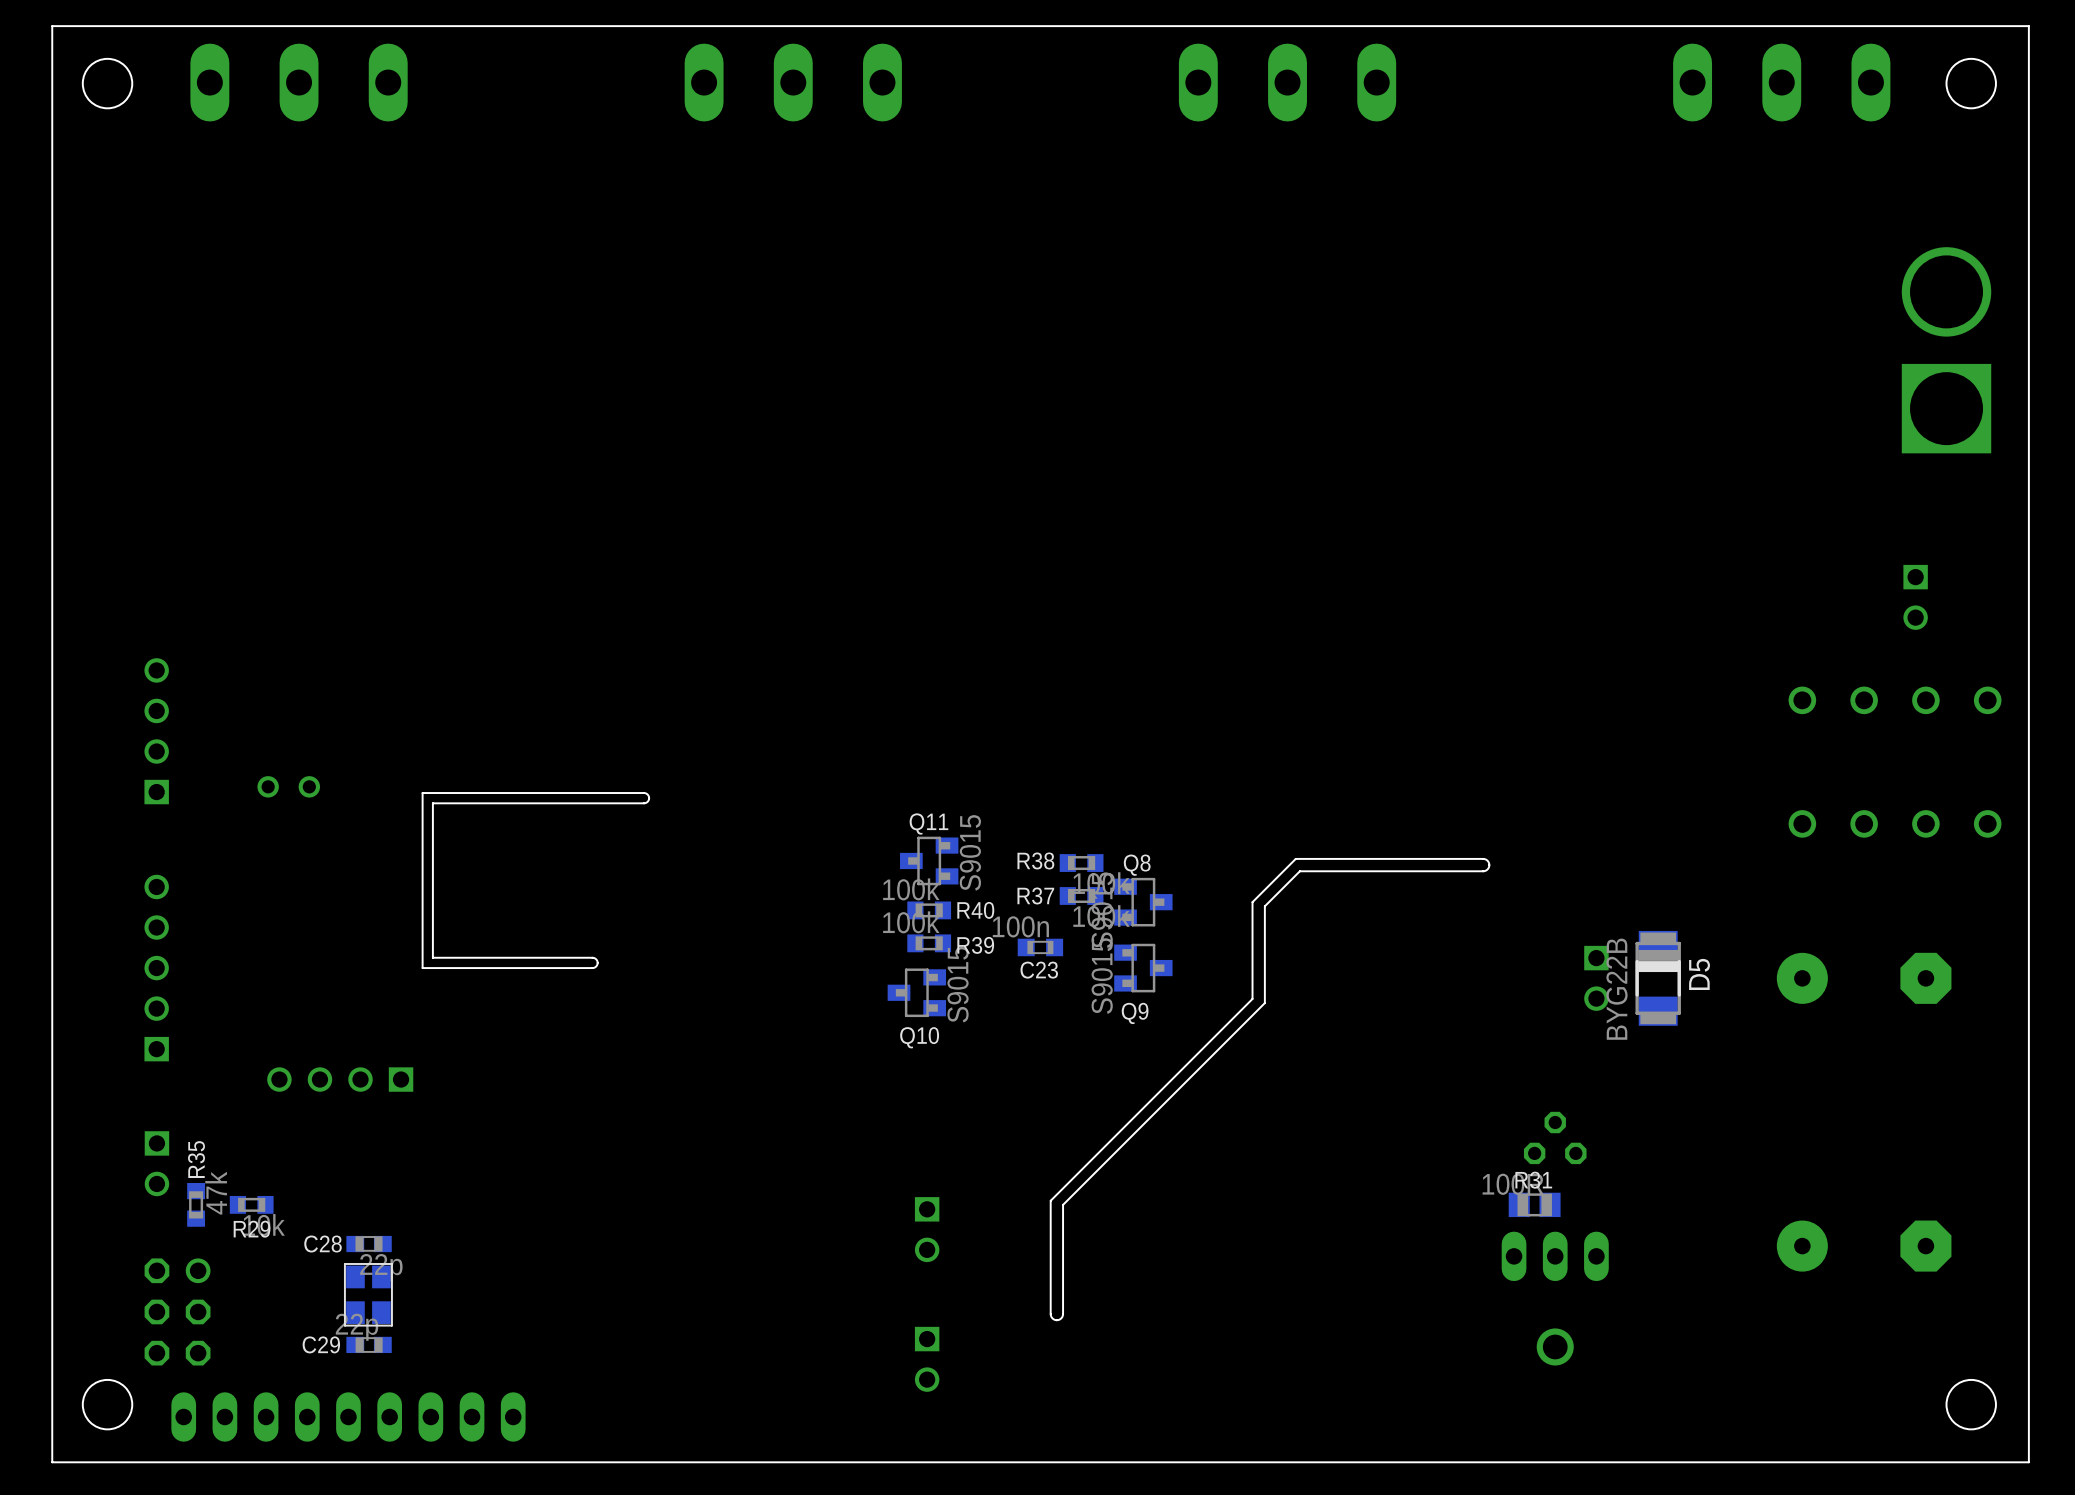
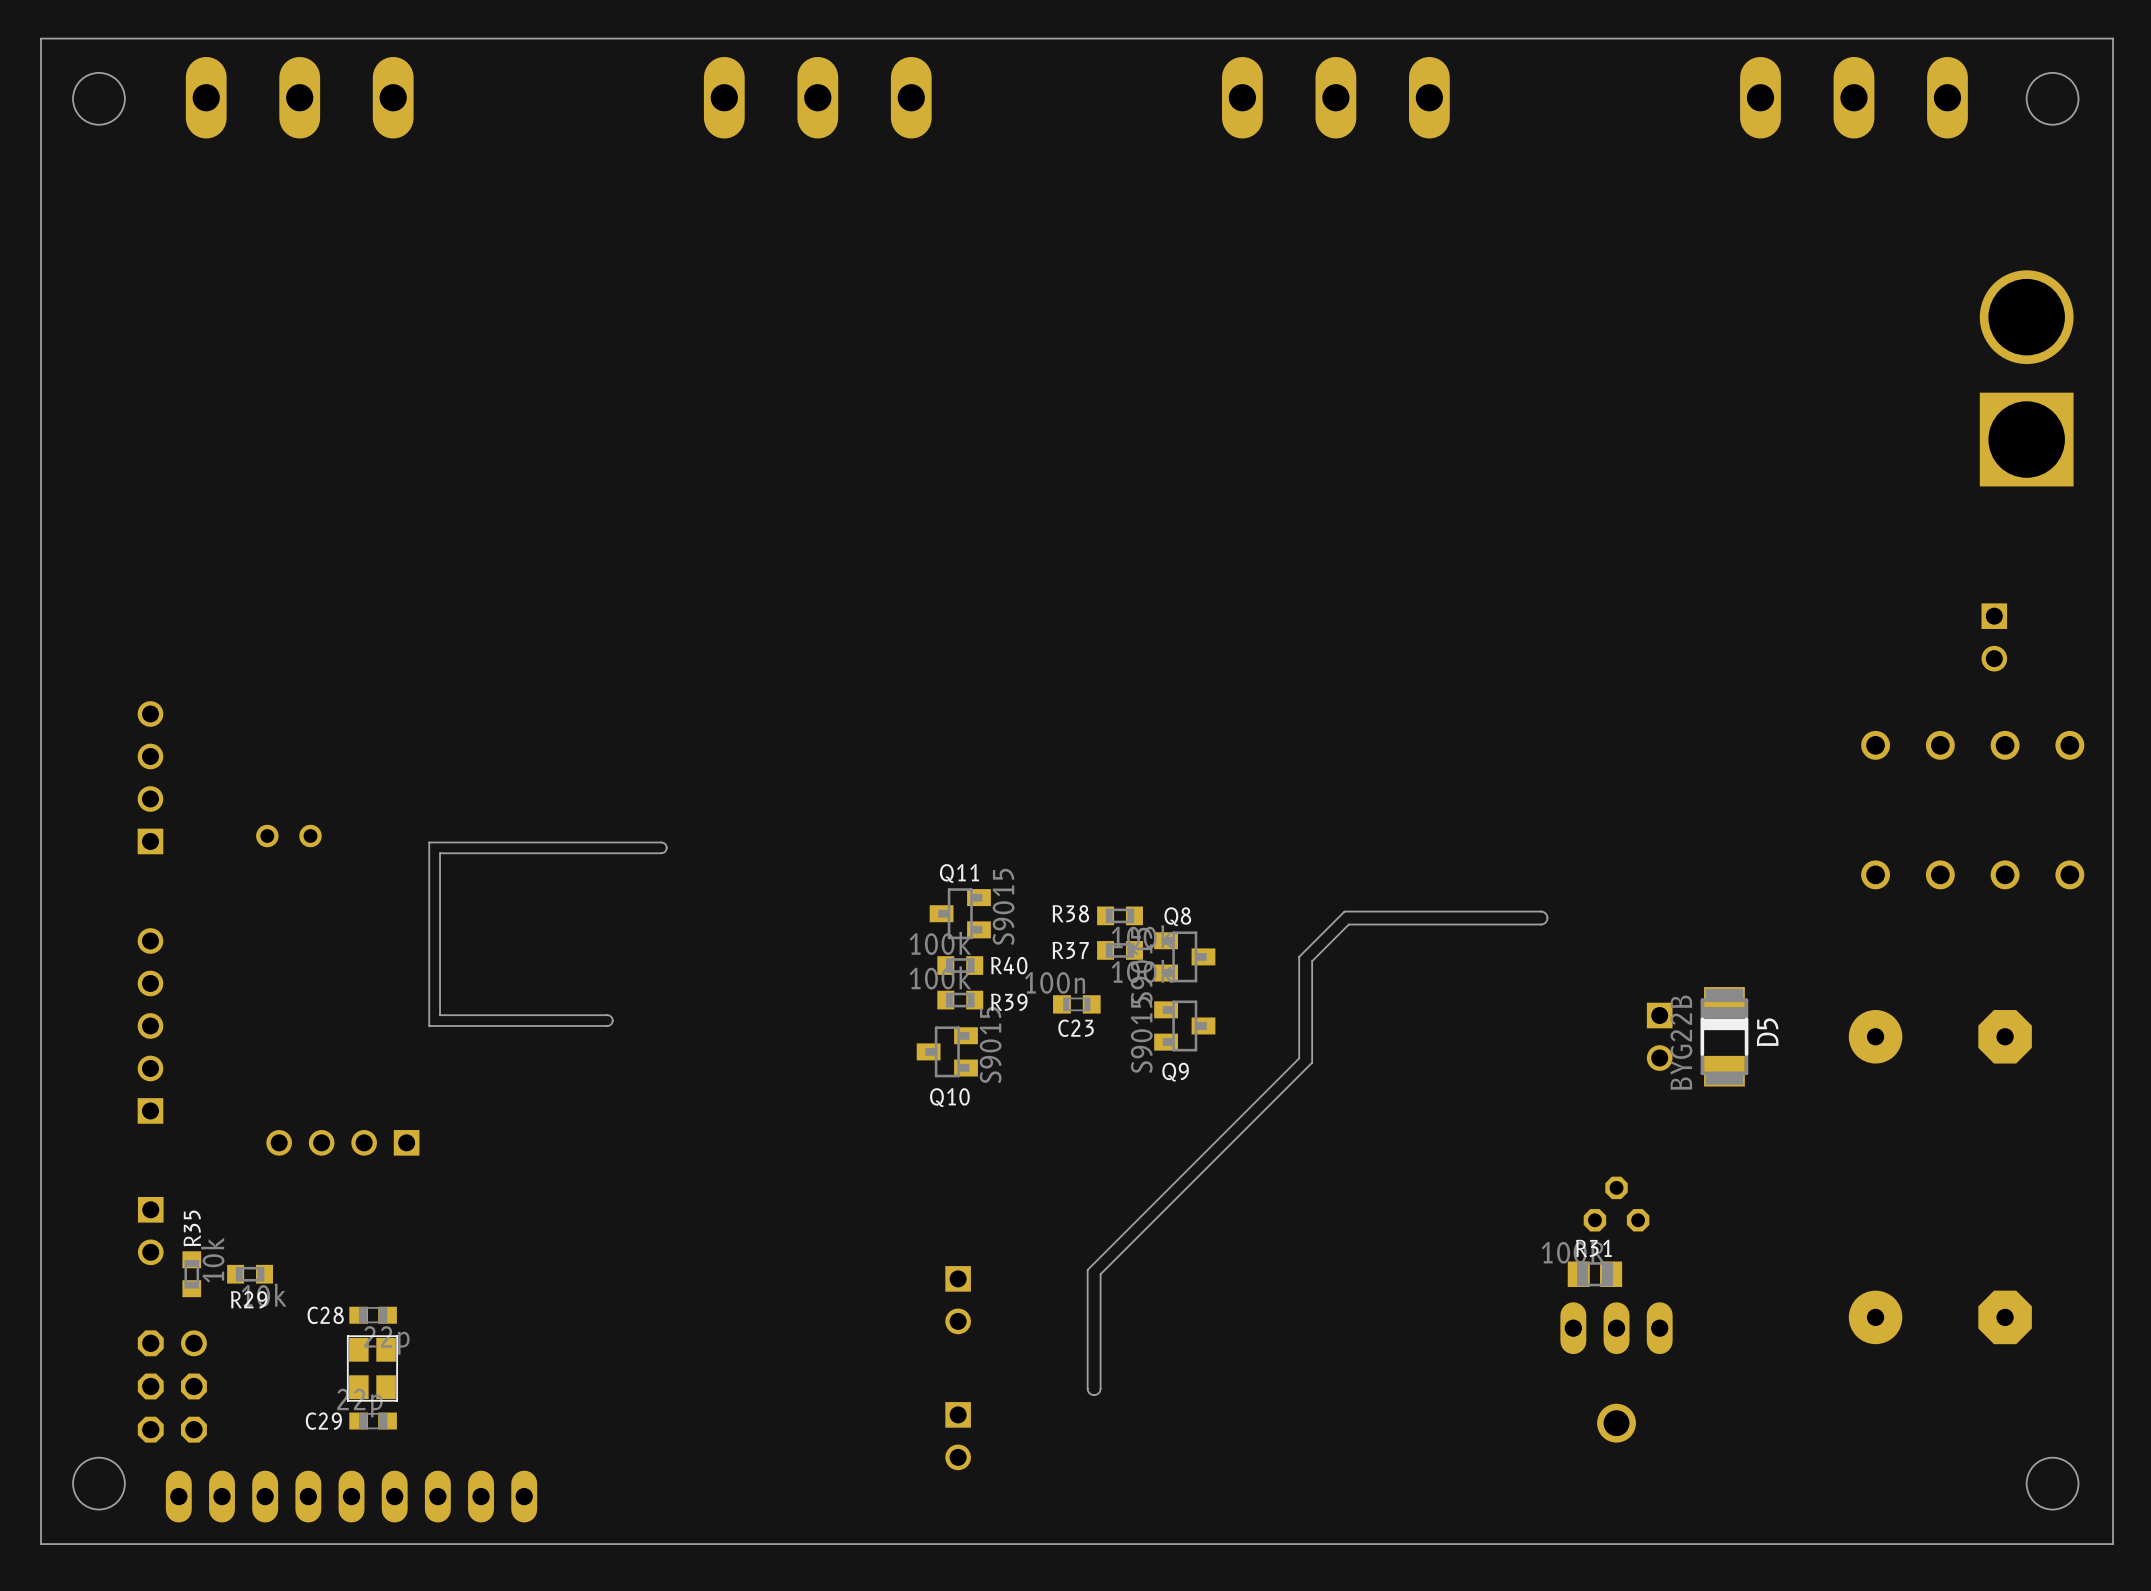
R35 value: 47k (216, 1193) -> 10k (212, 1260)

